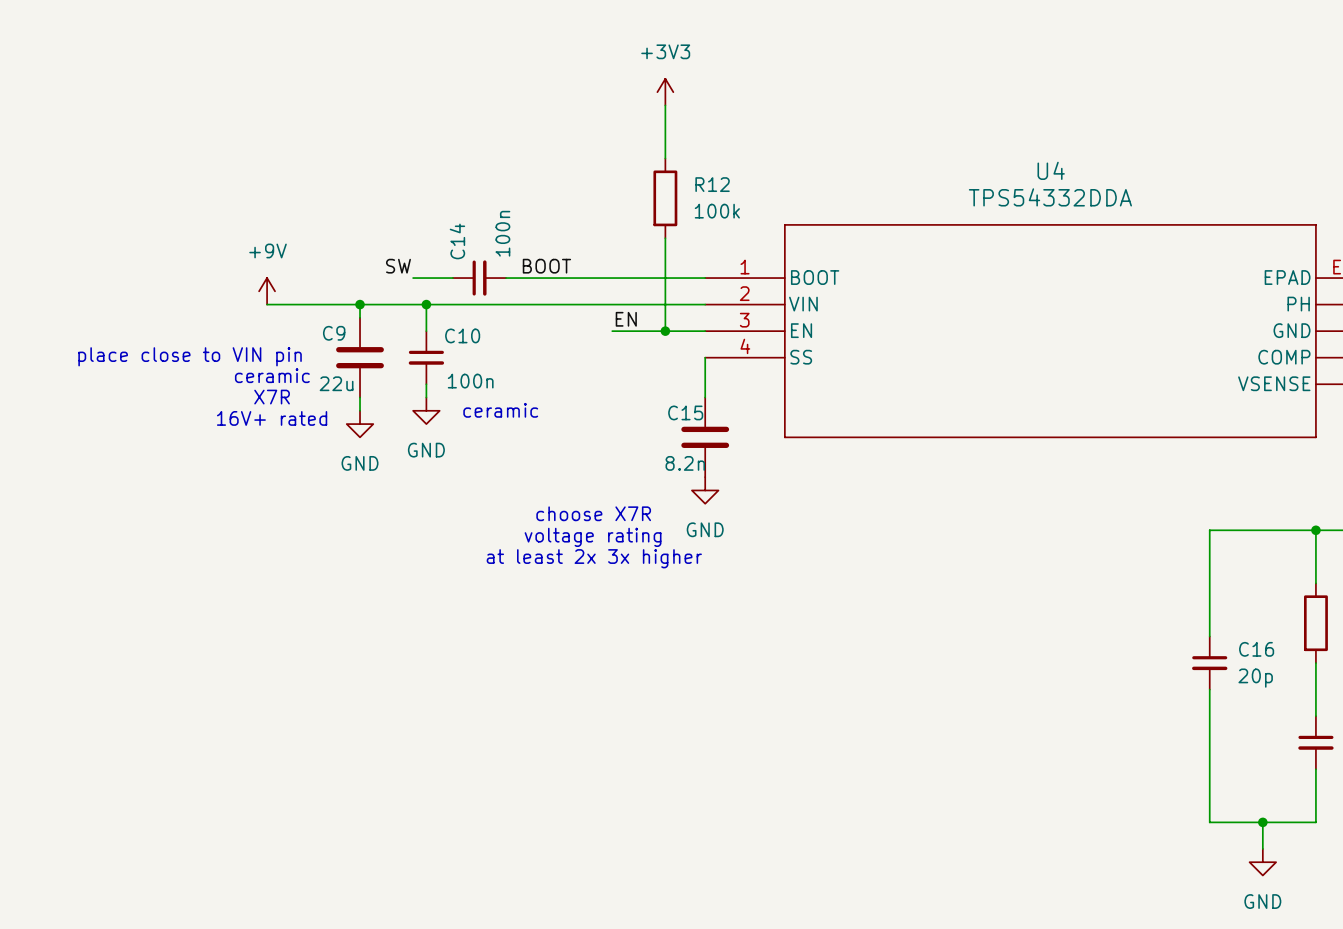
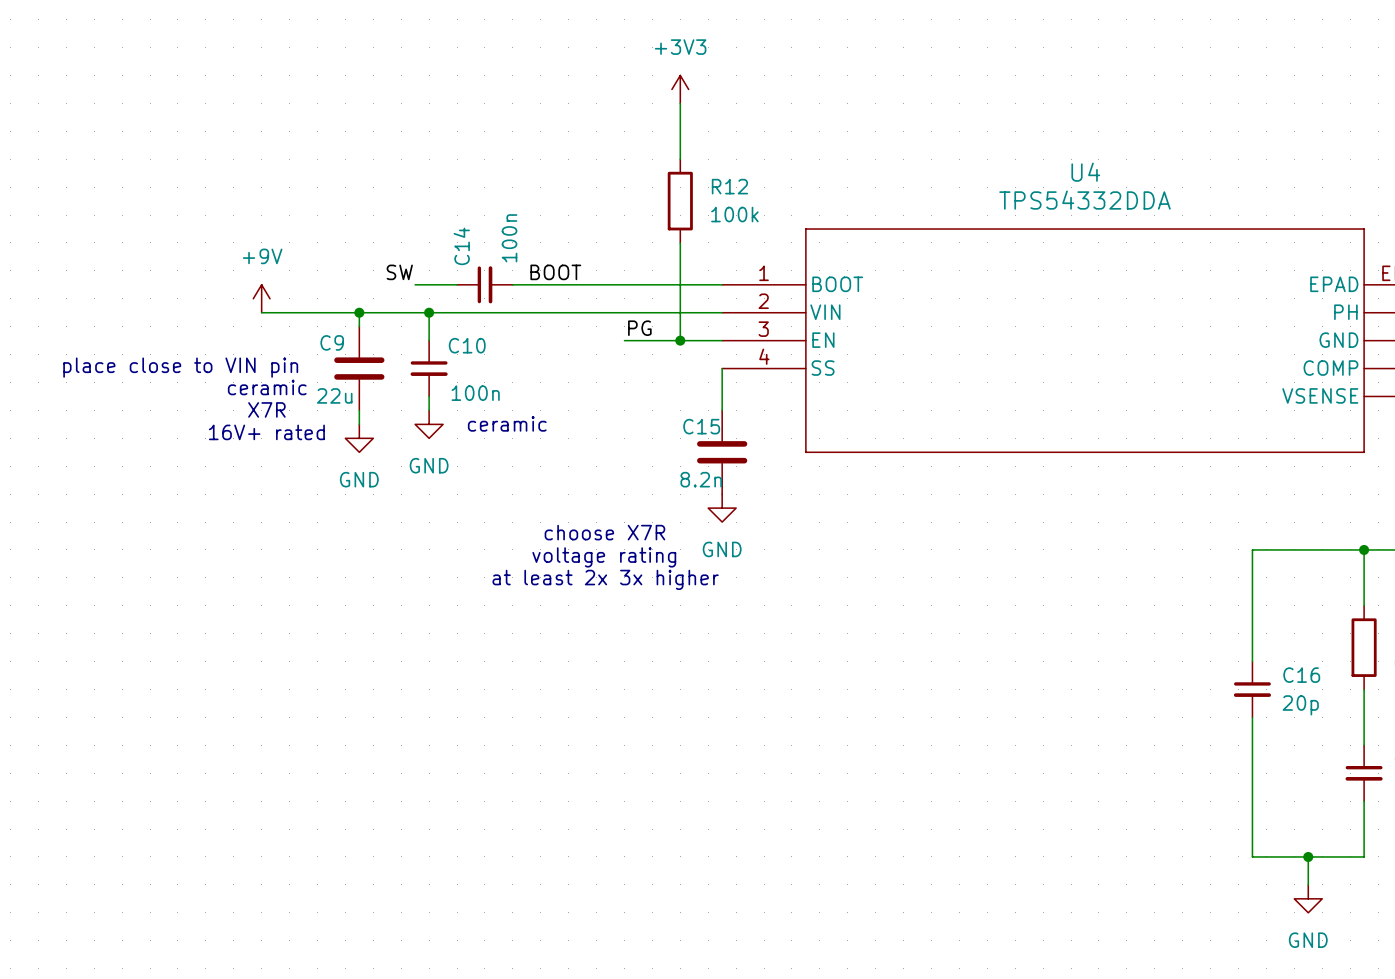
label: EN (626, 319) -> PG (639, 328)

